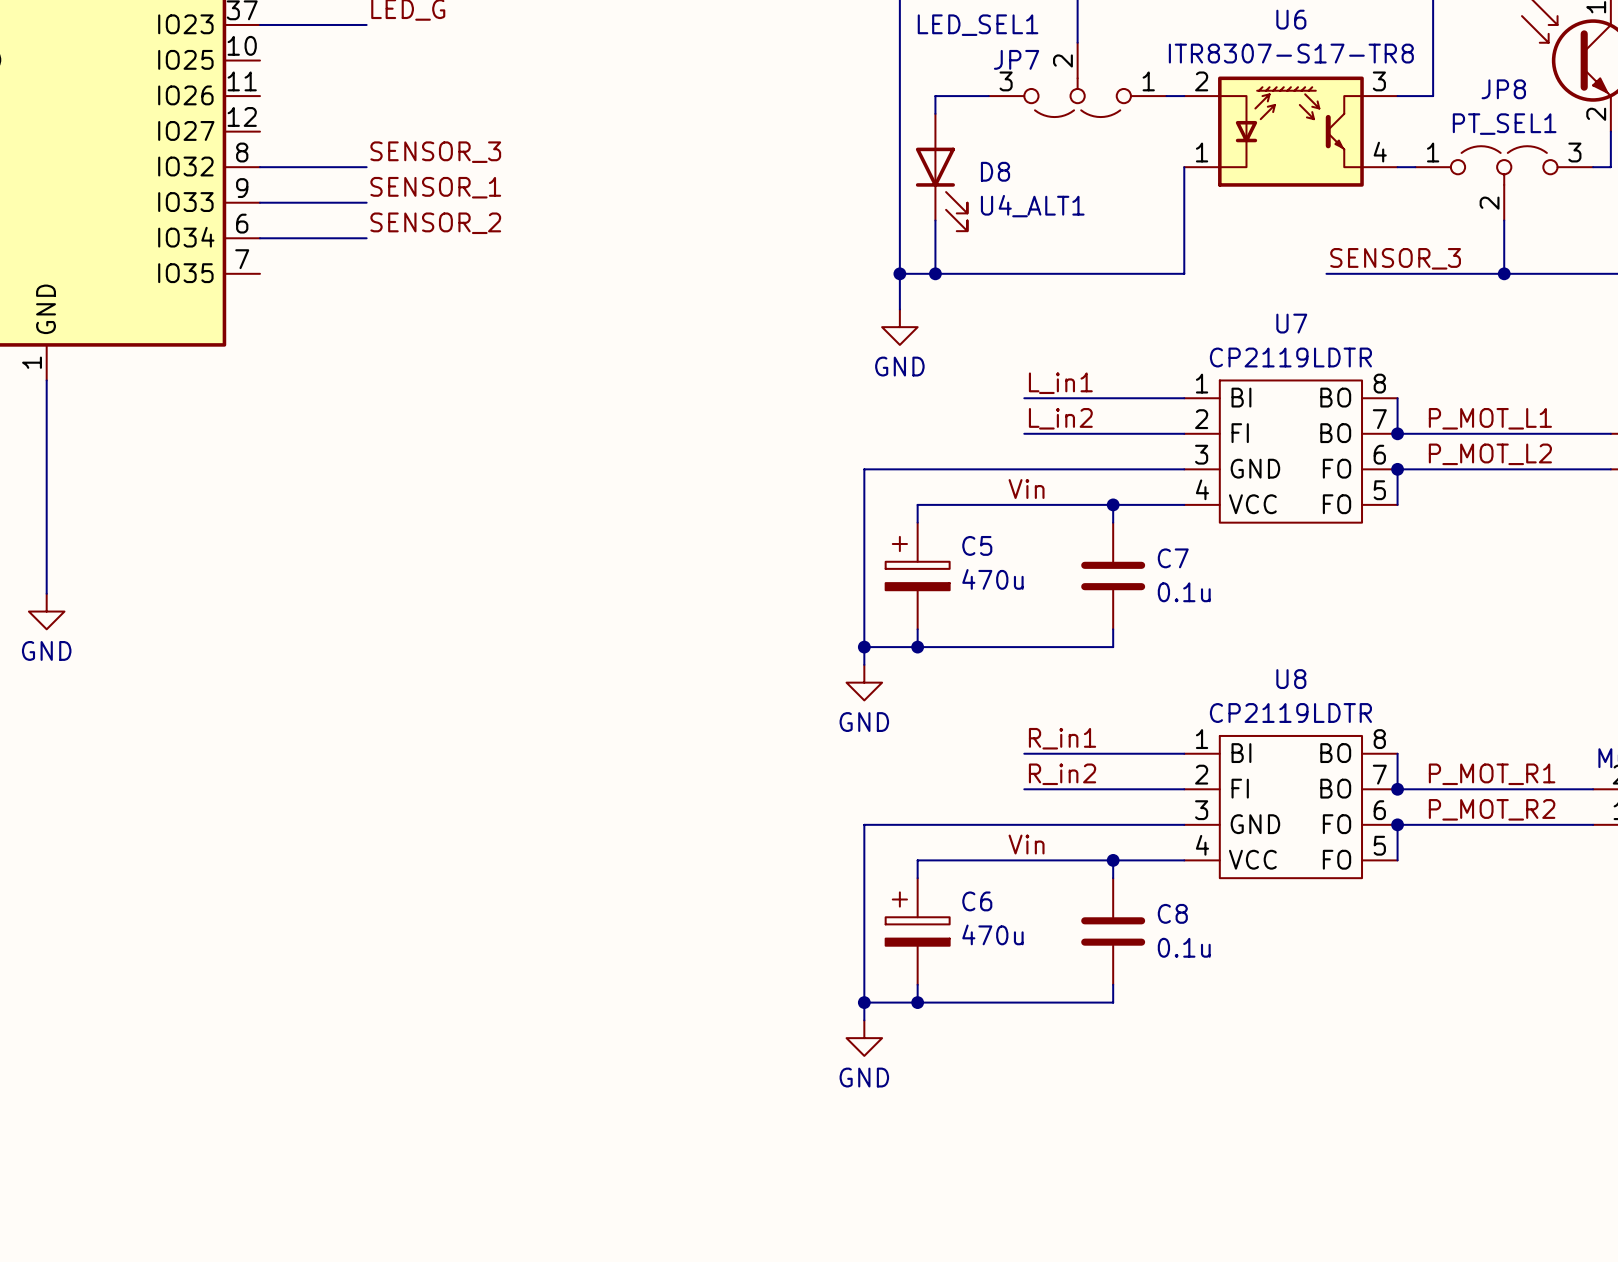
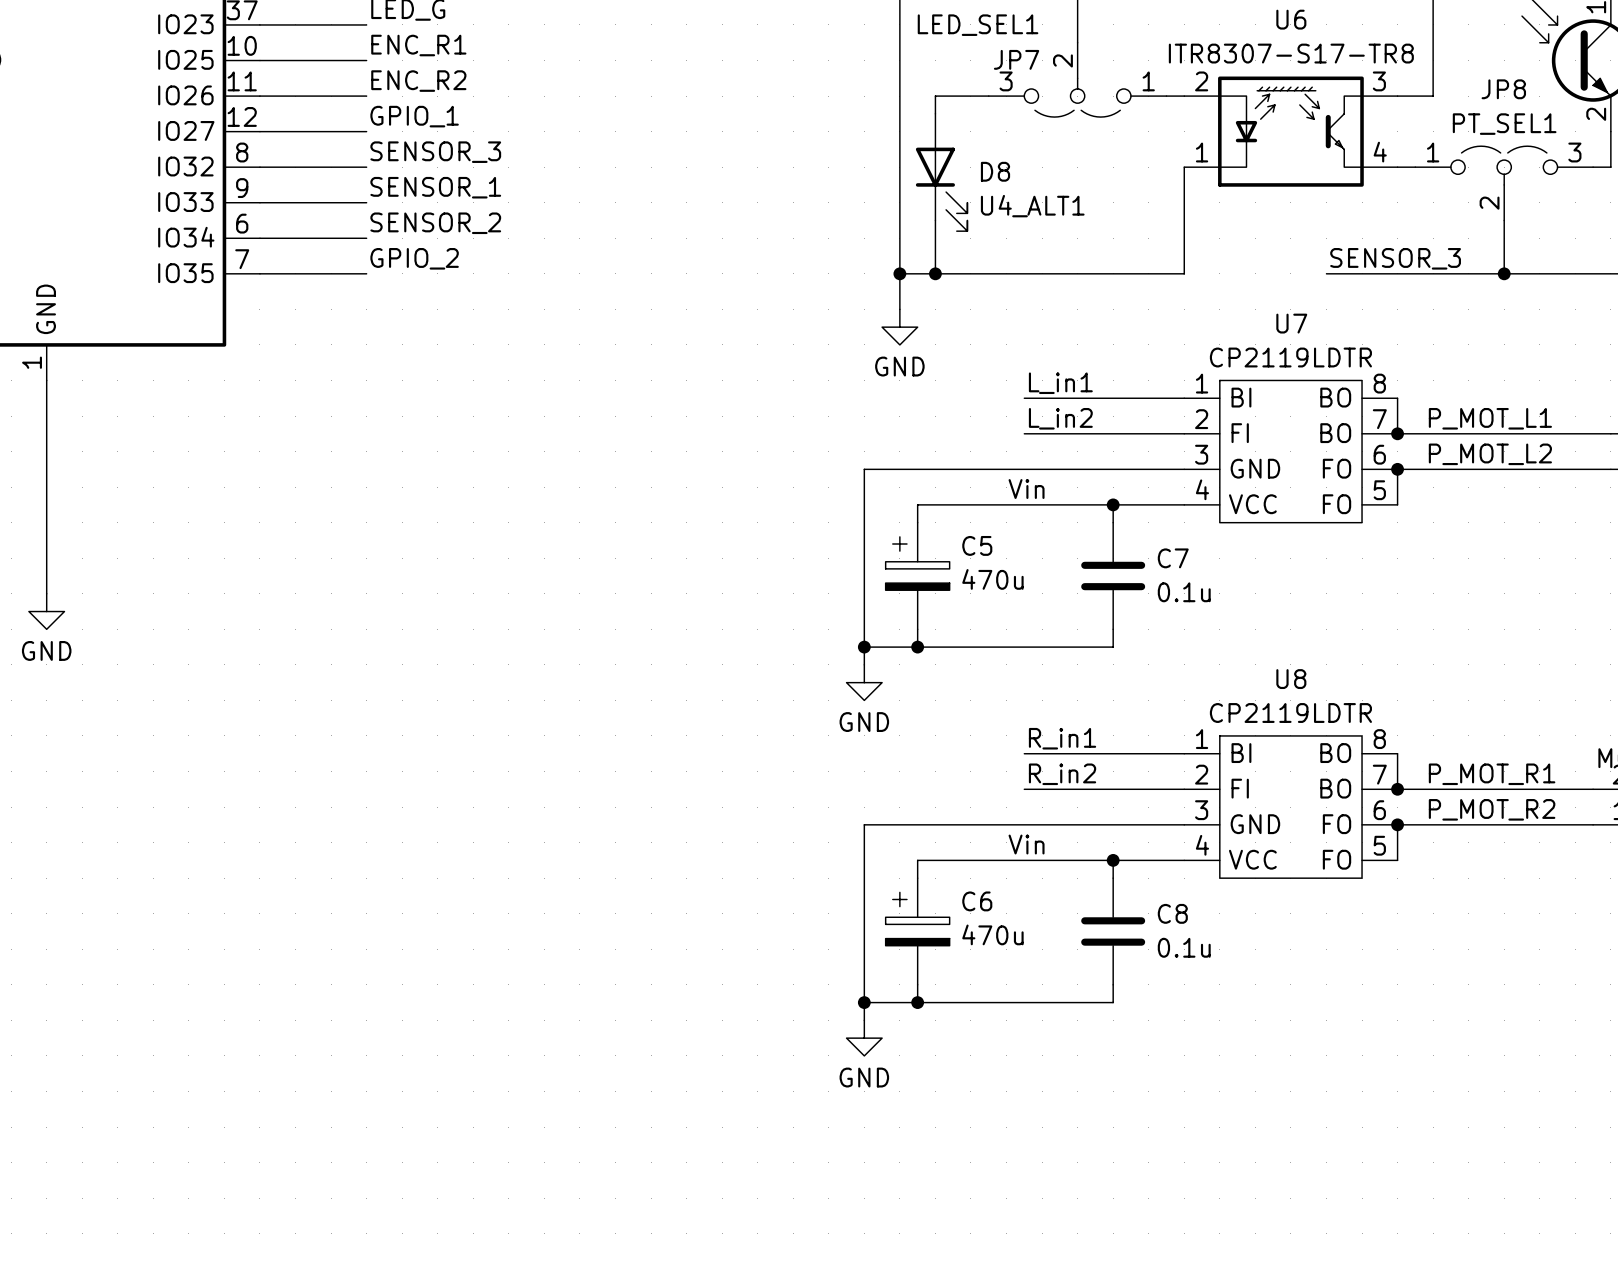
label: none -> ENC_R1 (418, 45)
wire: none -> (259, 60) (366, 60)
label: none -> ENC_R2 (418, 81)
wire: none -> (259, 96) (366, 96)
label: none -> GPIO_1 (414, 116)
wire: none -> (259, 131) (366, 131)
label: none -> GPIO_2 (414, 258)
wire: none -> (259, 273) (366, 273)

